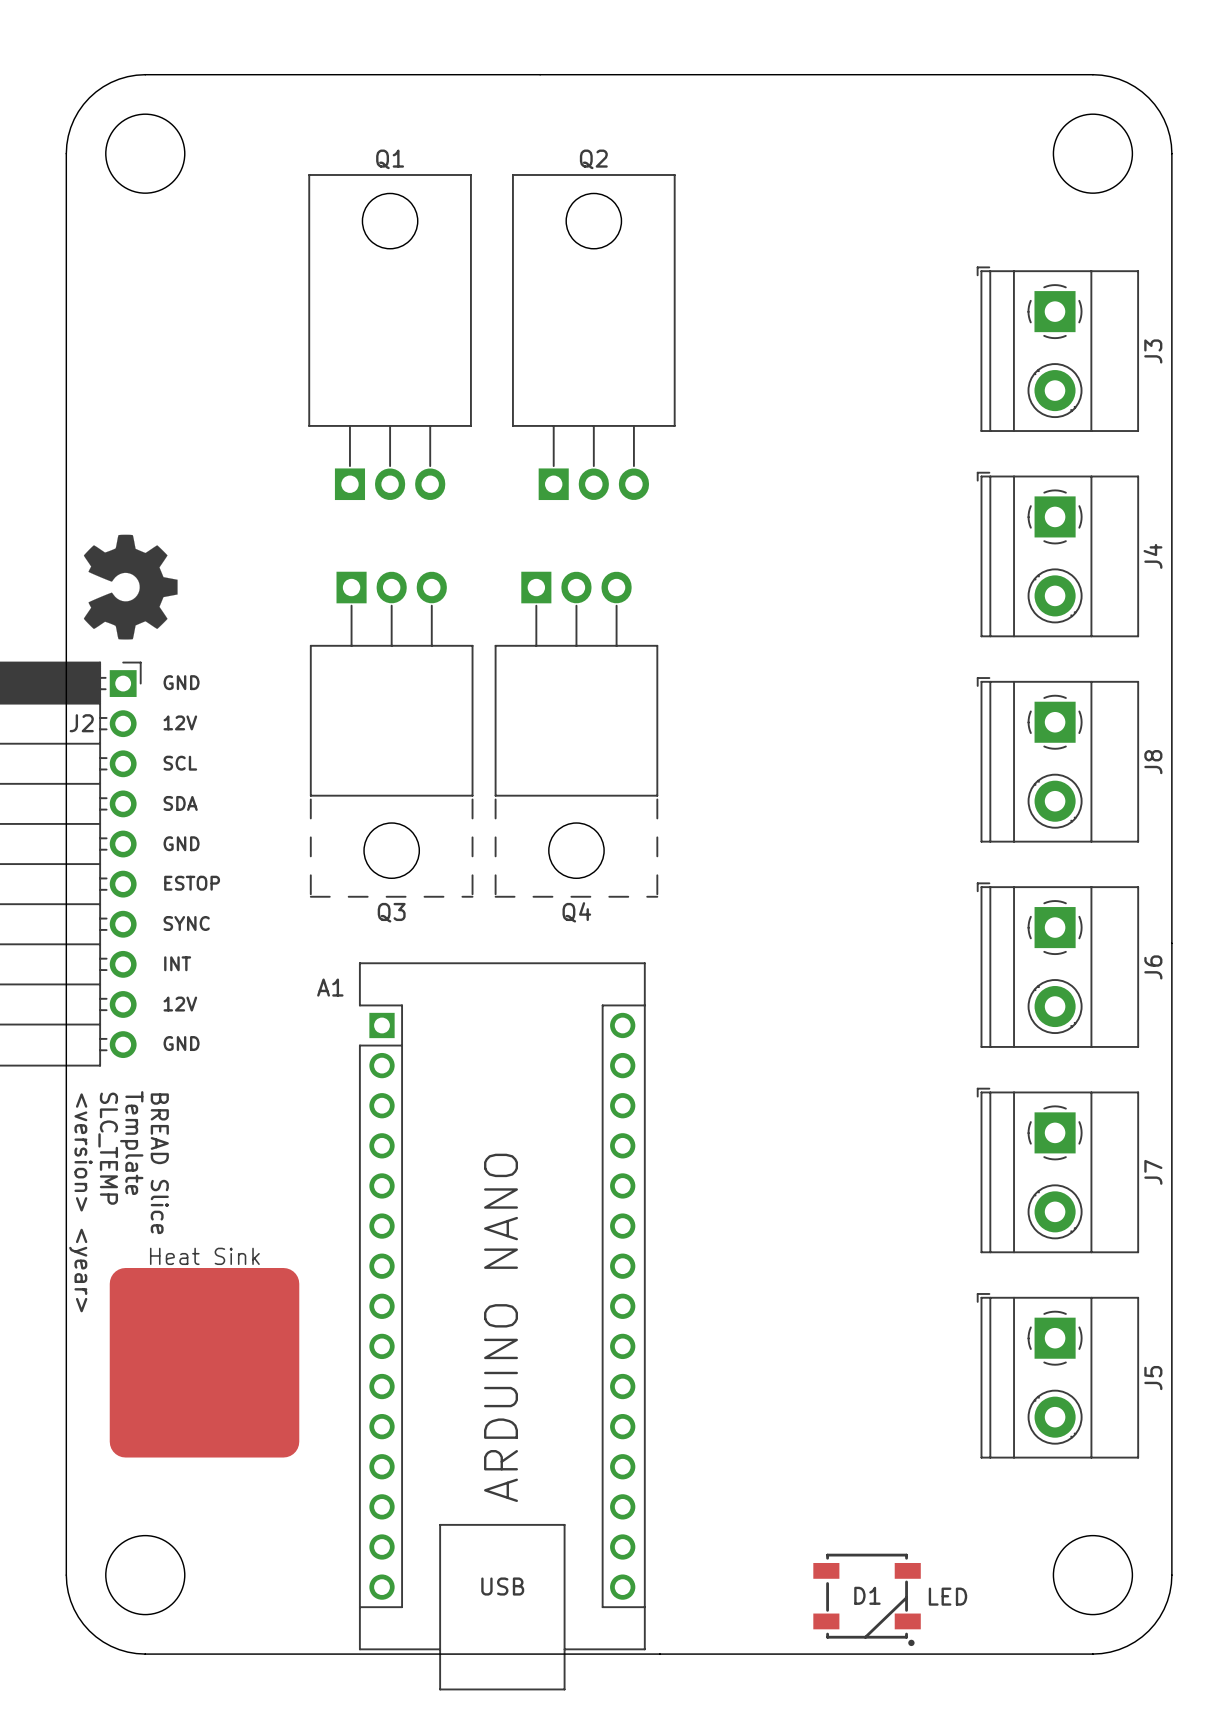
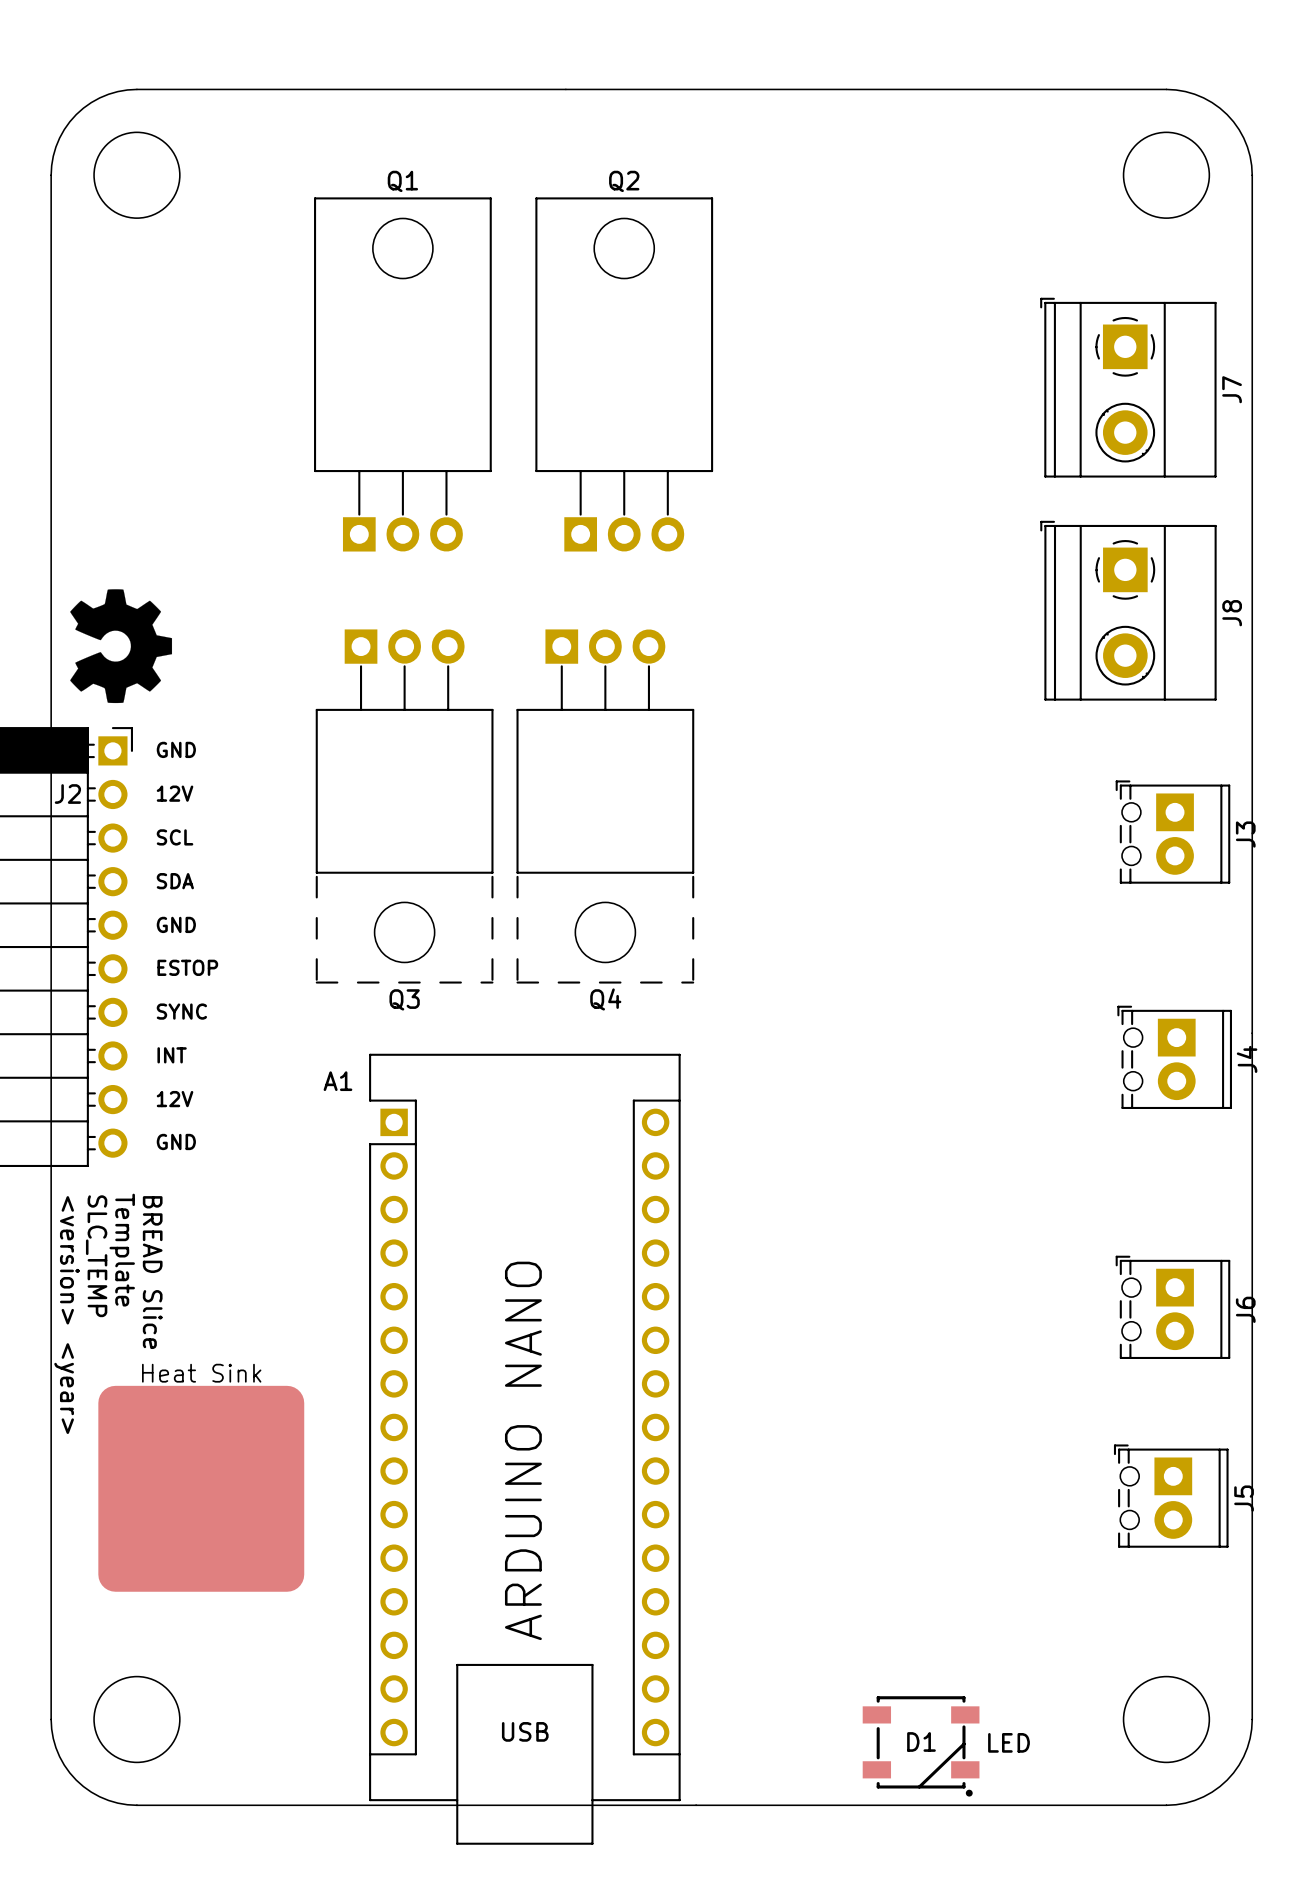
J3 name: J3 (1153, 351) -> J7 (1232, 389)
J4 name: J4 (1152, 556) -> J8 (1232, 613)
J3: none -> (1172, 832)
J8: (1057, 759) -> none
J6 footprint: [976, 882, 1140, 1048] -> [1115, 1255, 1231, 1360]
J4: none -> (1174, 1057)
J7: (1057, 1170) -> none
J5 footprint: [976, 1293, 1140, 1459] -> [1113, 1444, 1229, 1548]

